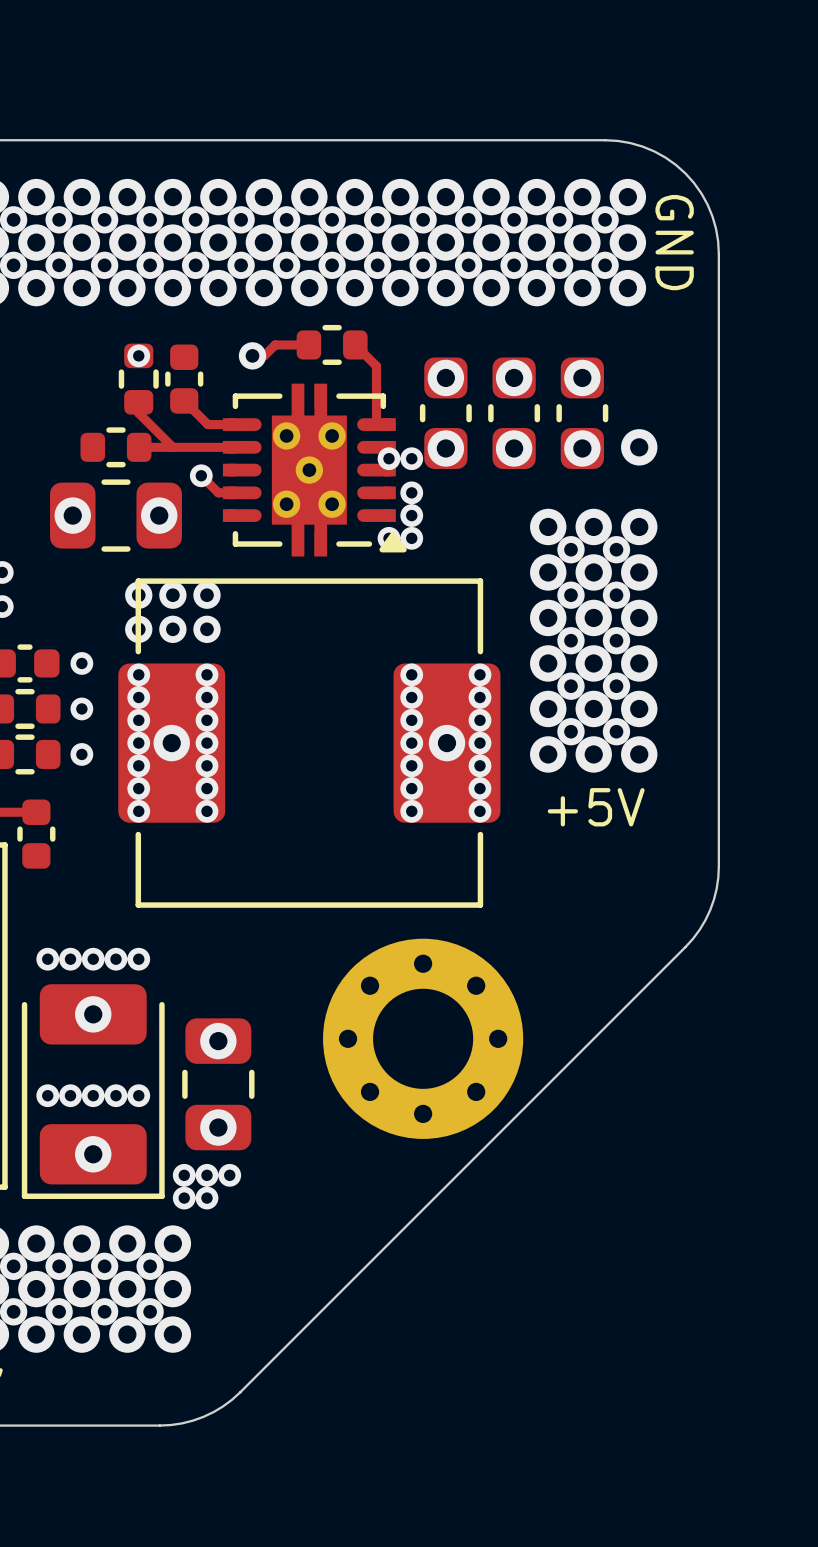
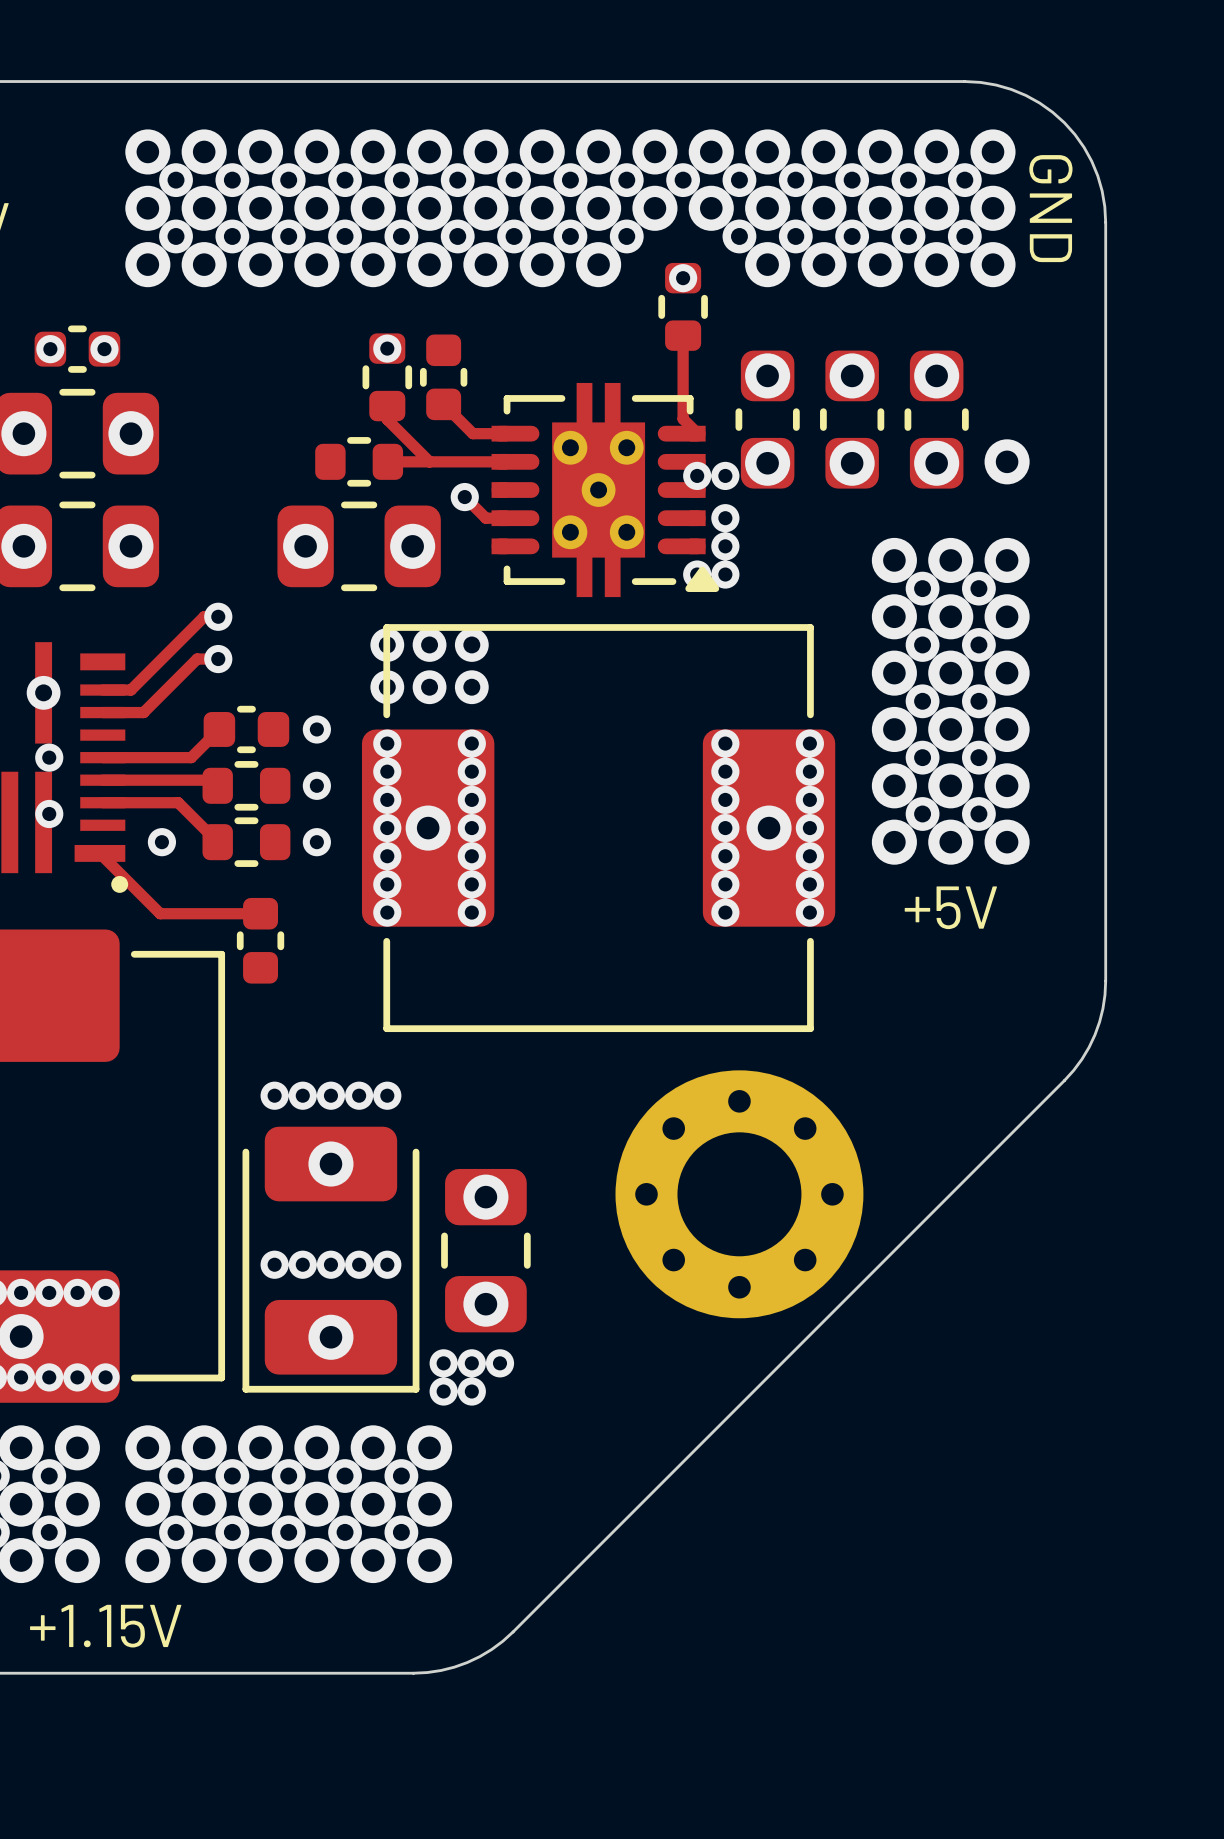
via: (377, 265) -> none
via: (354, 288) -> none
via: (400, 288) -> none
via: none -> (683, 278)
track: (308, 344) (275, 344) (264, 355) (252, 355) -> none
part rotation: 0° (332, 344) -> 90° clockwise (683, 306)
part position: (332, 344) -> (683, 306)
track: (355, 344) (376, 366) (376, 424) -> none
track: none -> (683, 335) (683, 419) (697, 433)
via: (252, 355) -> none

